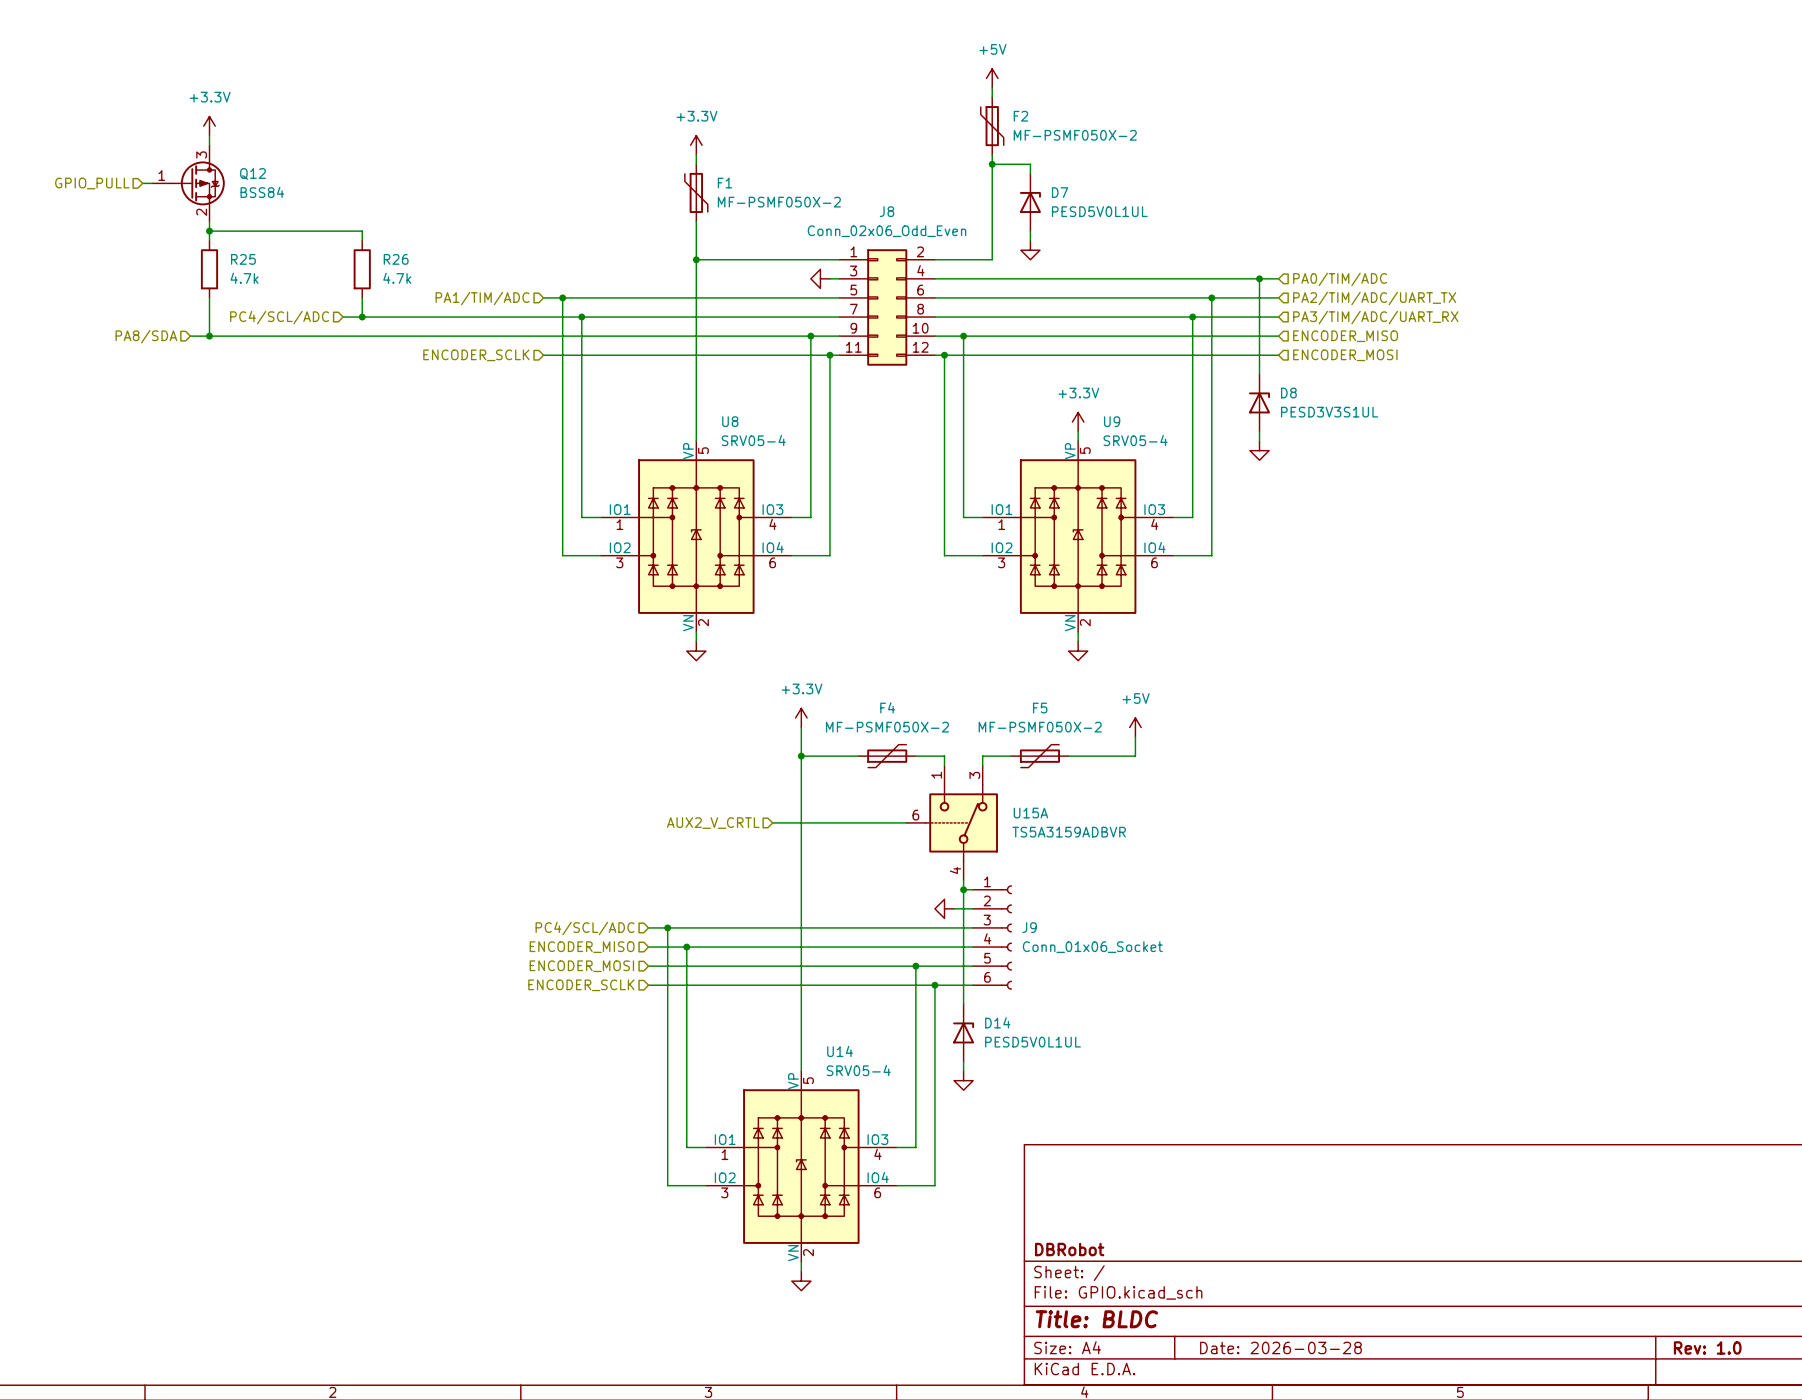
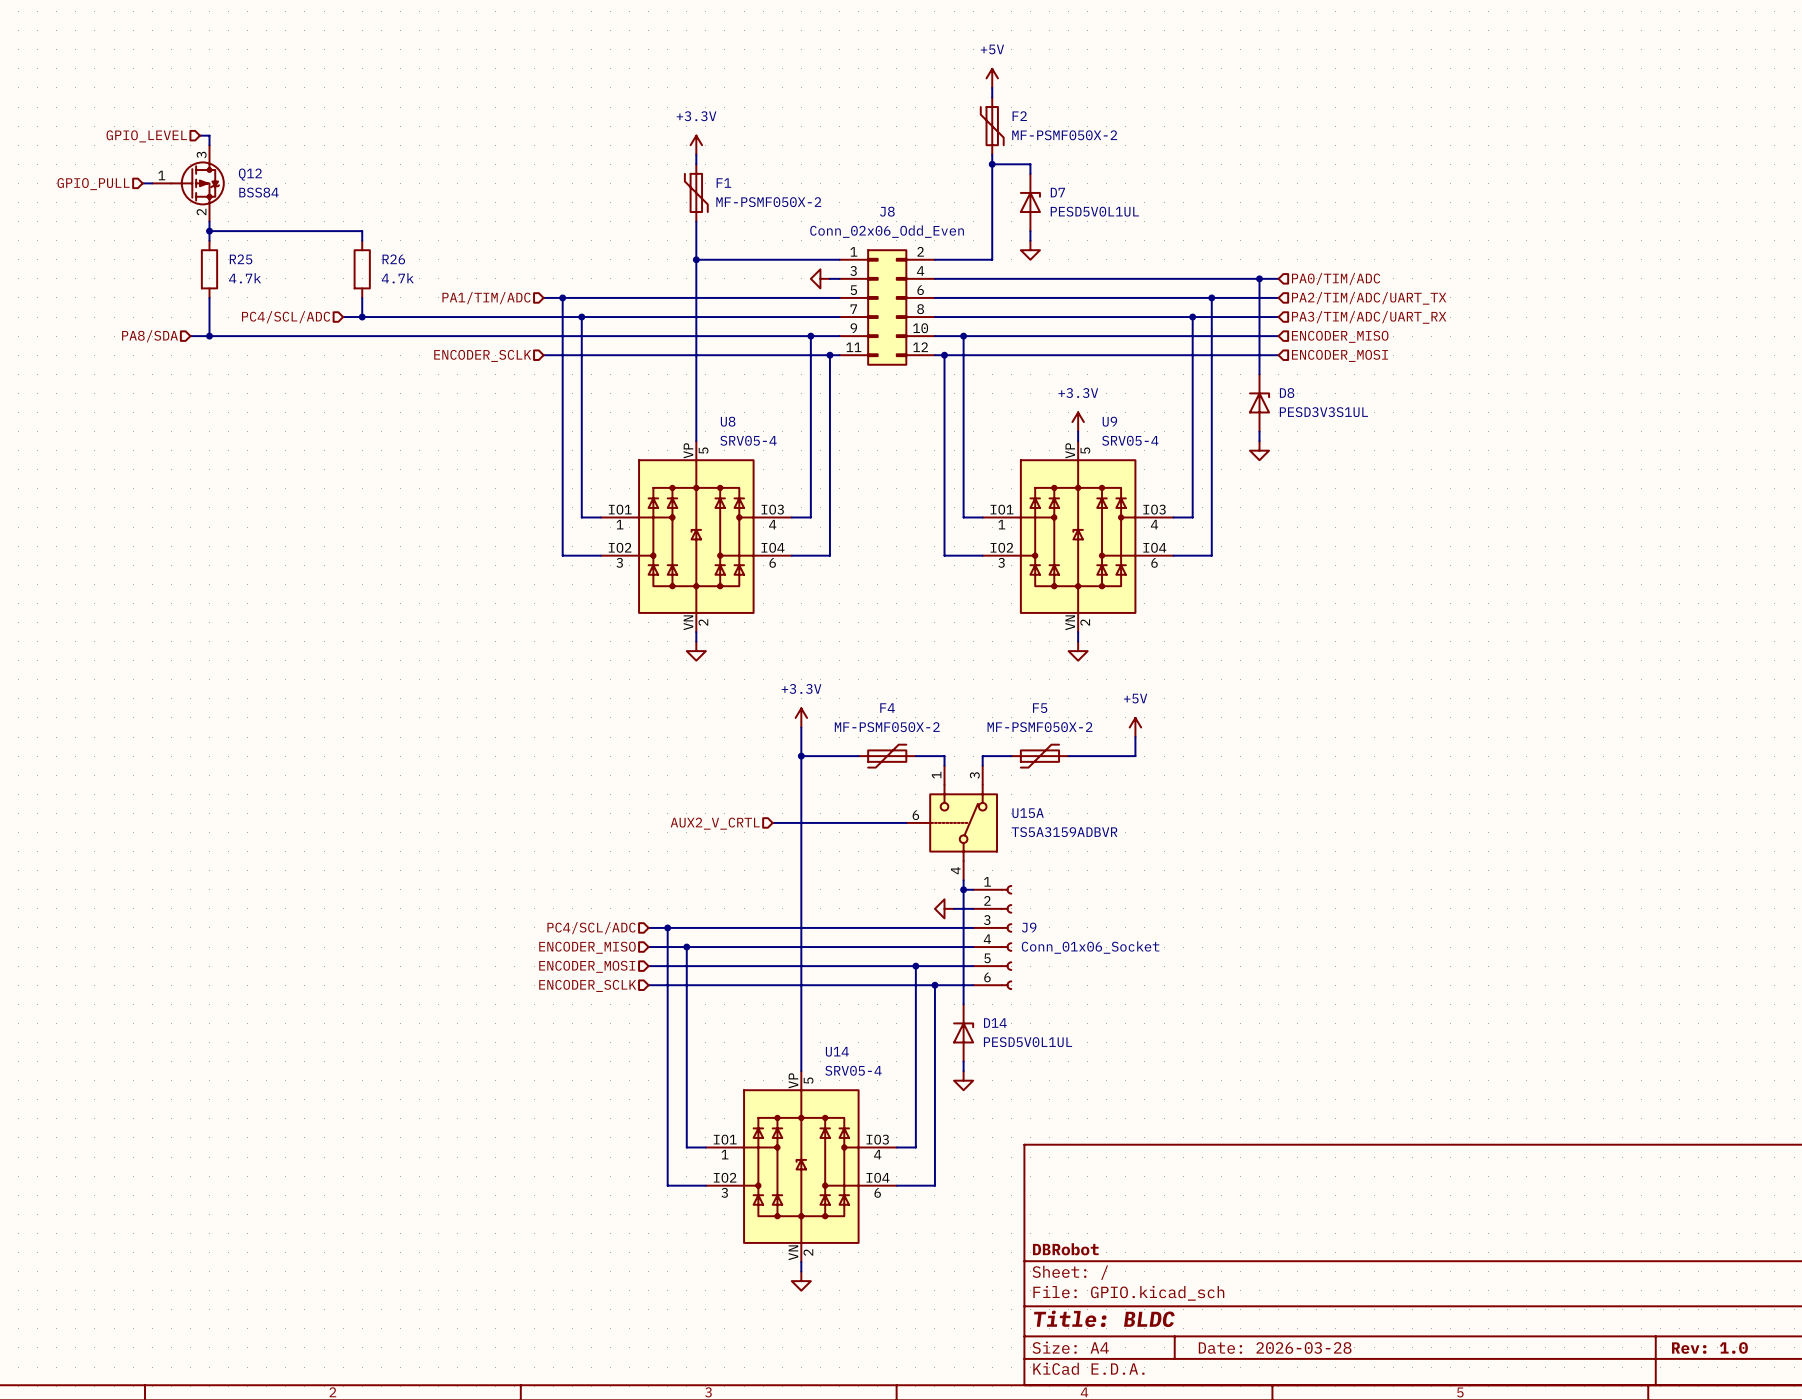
power symbol: +3.3V (209, 126) -> none
hierarchical label: none -> GPIO_LEVEL (146, 136)
wire: none -> (199, 135) (209, 135)

